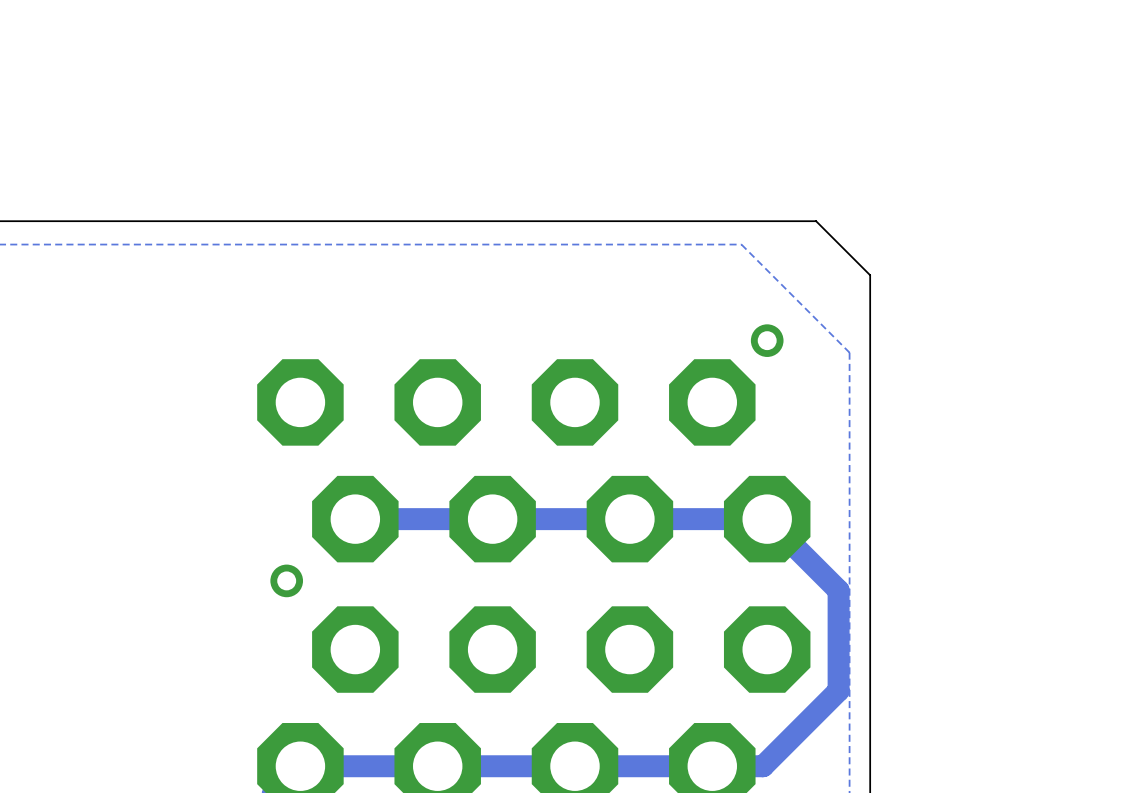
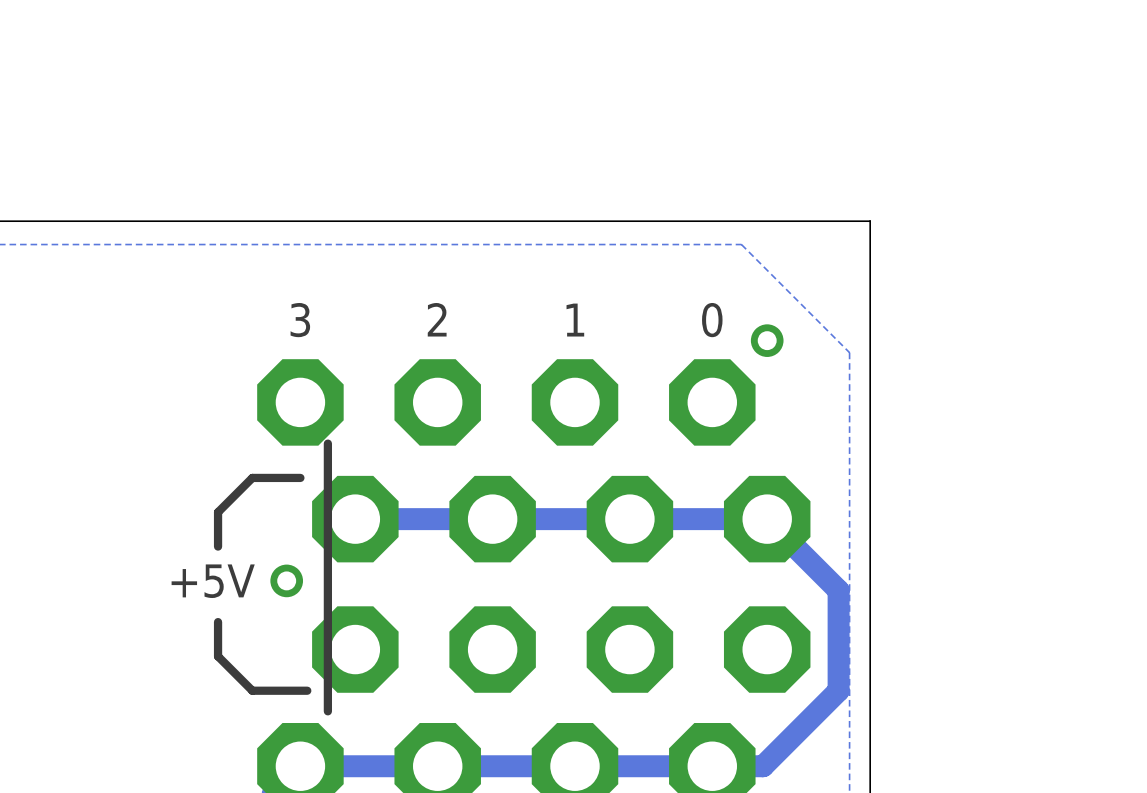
board edge: (816, 221) (870, 275) -> (816, 221) (870, 221) (870, 275)
text: none -> 3 (300, 320)
text: none -> 2 (437, 319)
text: none -> 1 (575, 320)
text: none -> 0 (712, 320)
line: none -> (327, 443) (327, 711)
line: none -> (300, 477) (252, 477) (218, 512) (218, 546)
text: none -> +5V (213, 581)
line: none -> (218, 622) (218, 656) (252, 690) (307, 690)

